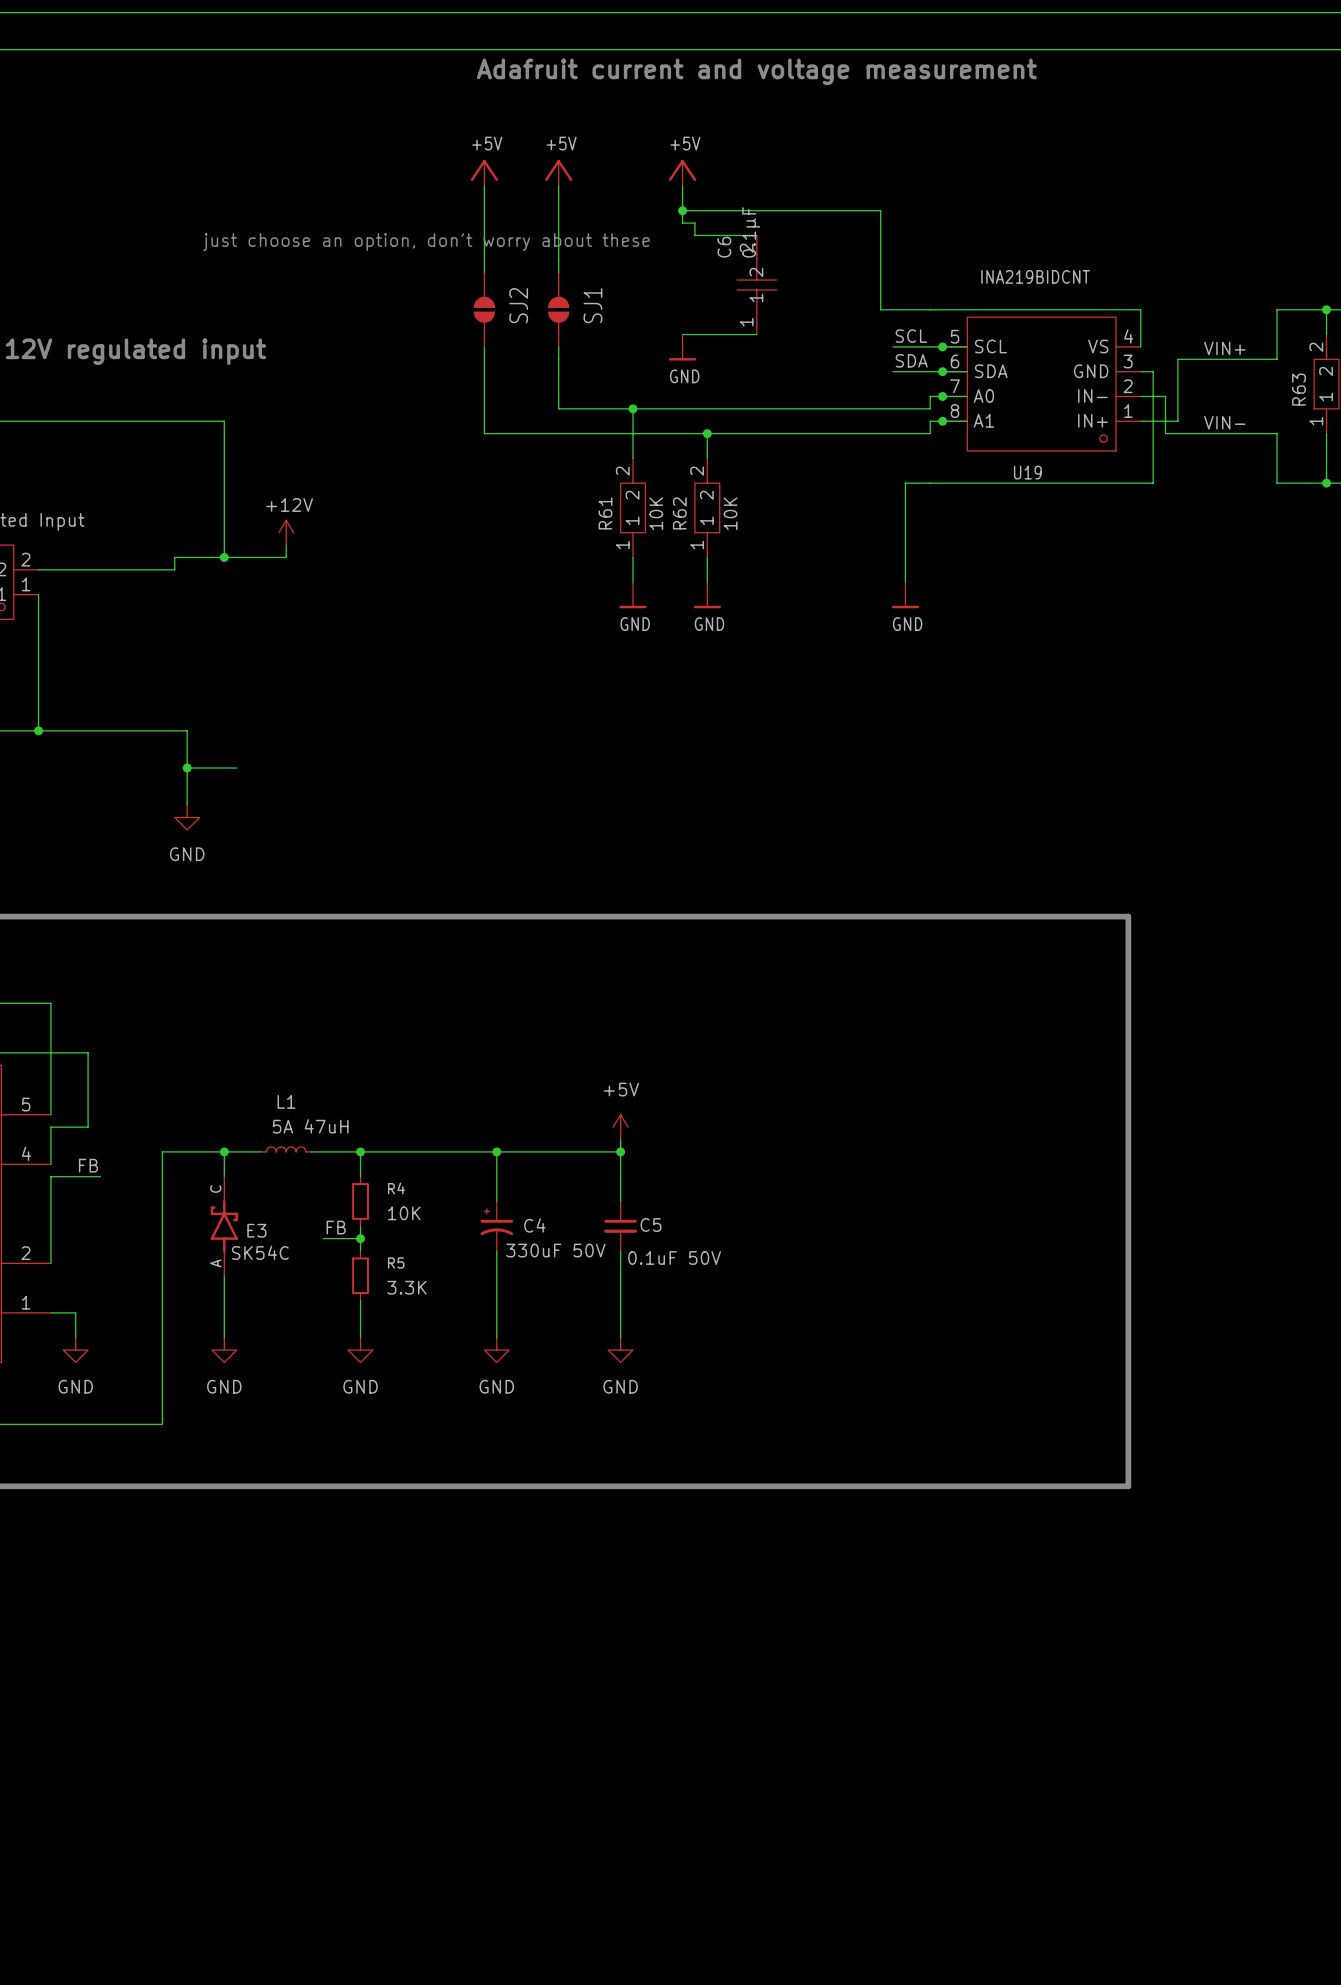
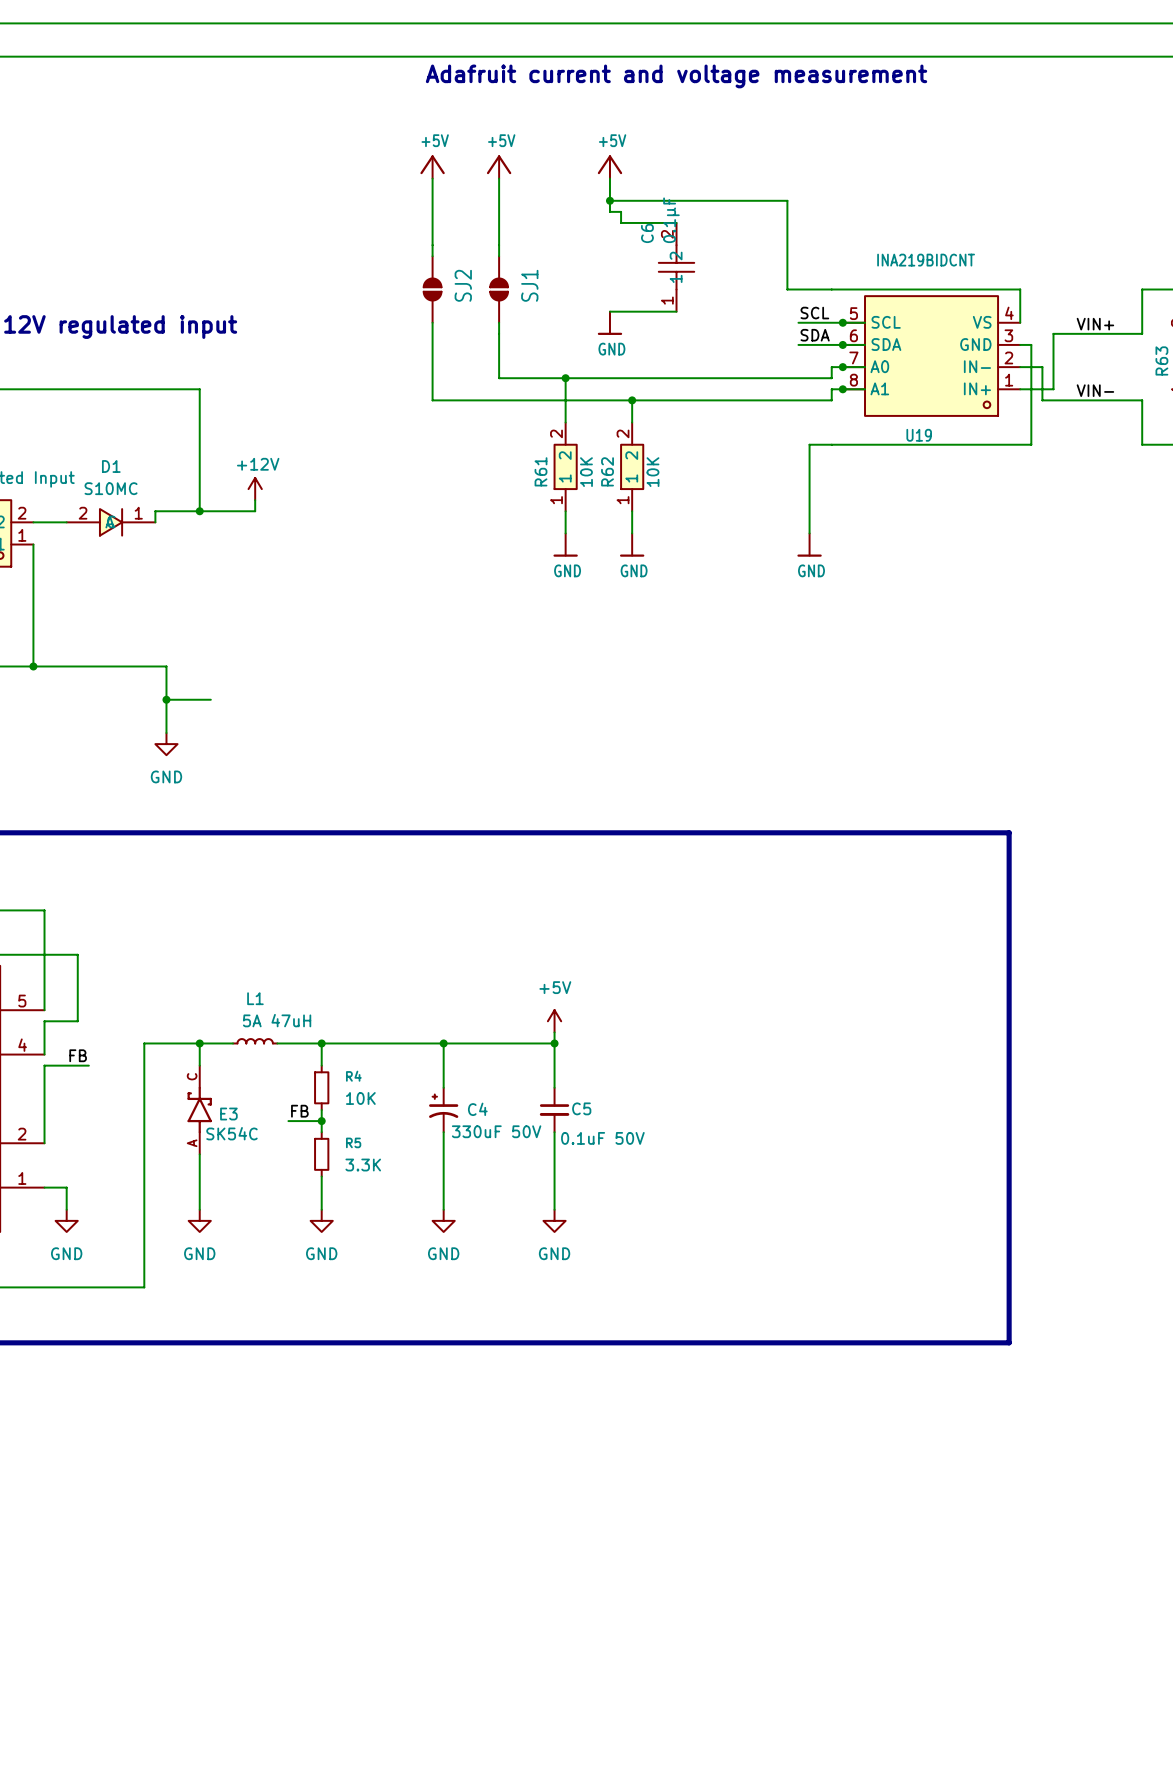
text: just choose an option, don't worry about these (426, 242) -> none
D1: none -> S10MC (111, 522)

